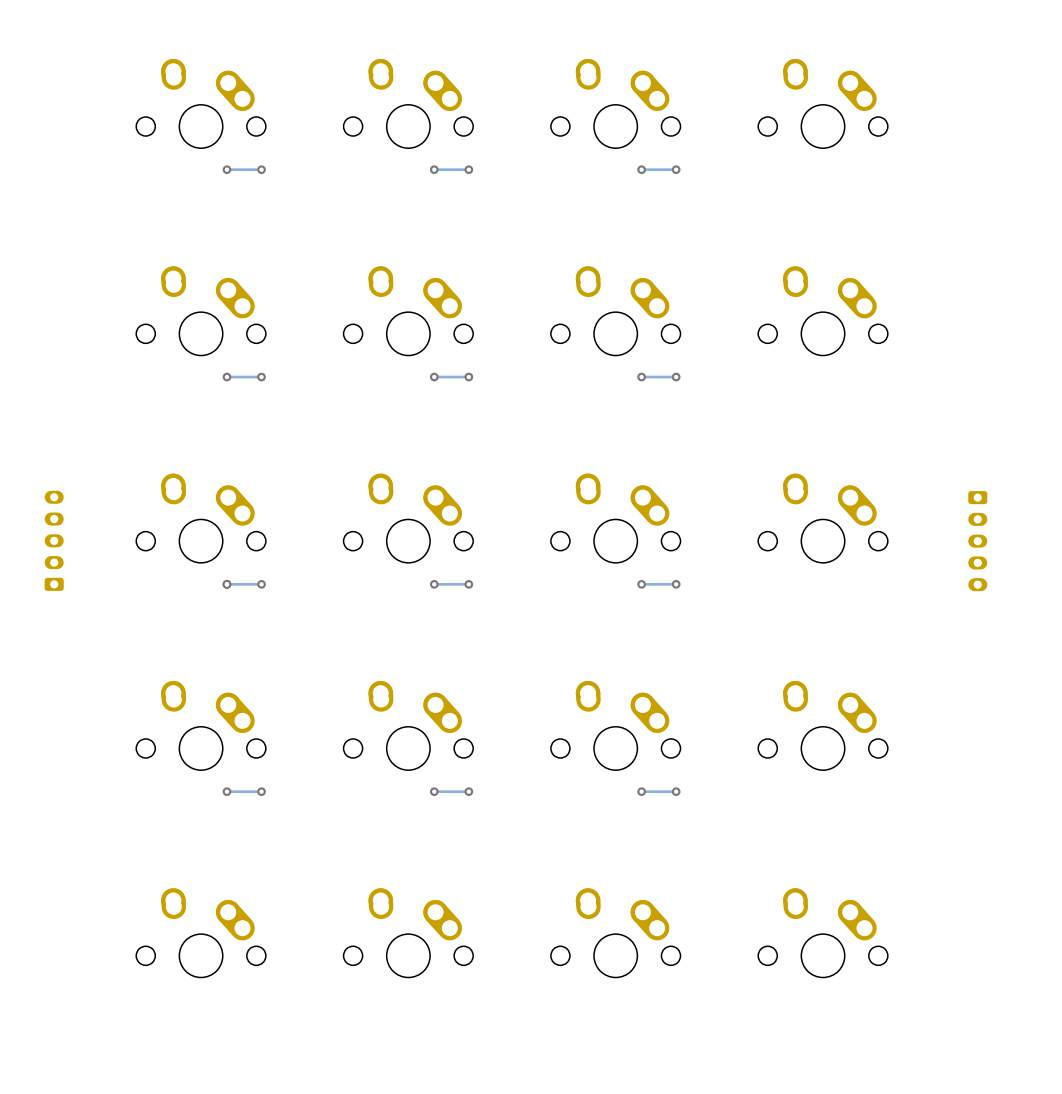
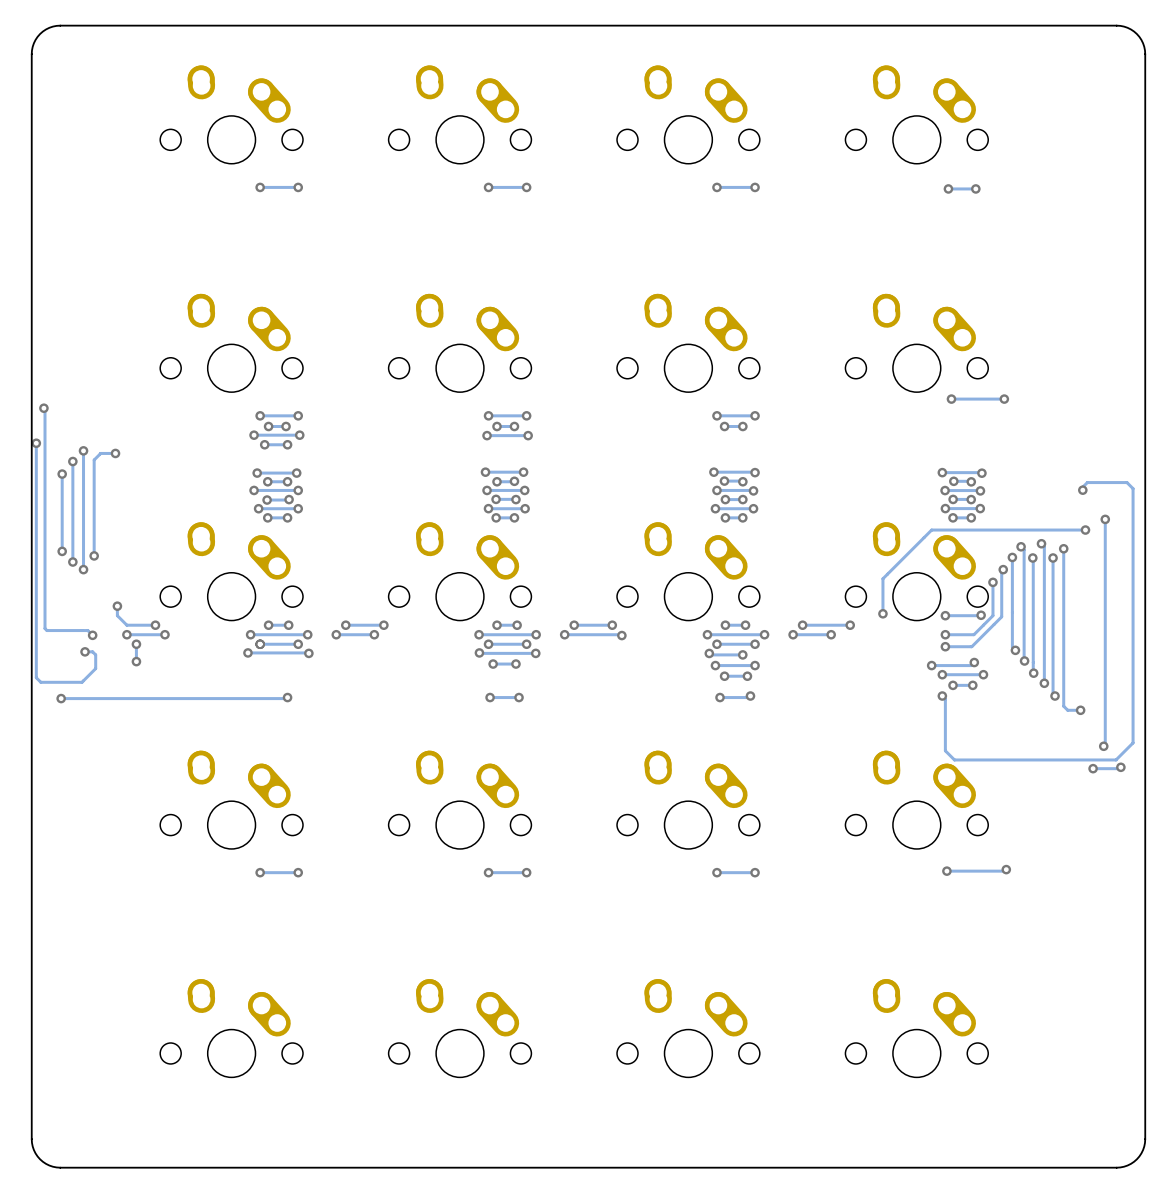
board edge: none -> (1116, 25) (60, 25) (49, 27) (40, 33) (33, 43) (31, 54) (31, 1139) (33, 1150) (40, 1159) (49, 1165) (60, 1167) (1116, 1167) (1127, 1165) (1136, 1159) (1143, 1150) (1145, 1139) (1145, 54) (1143, 43) (1136, 33) (1127, 27) (1116, 25)
via: none -> (948, 188)
track: none -> (975, 188) (948, 188)
via: none -> (975, 188)
via: none -> (951, 399)
track: none -> (1004, 399) (951, 399)
via: none -> (1004, 399)
track: none -> (43, 408) (45, 628) (46, 630) (87, 630) (92, 635)
via: none -> (43, 408)
via: none -> (268, 426)
track: none -> (286, 426) (268, 426)
via: none -> (286, 426)
via: none -> (497, 426)
track: none -> (514, 426) (497, 426)
via: none -> (514, 426)
via: none -> (724, 426)
track: none -> (742, 426) (724, 426)
via: none -> (742, 426)
via: none -> (254, 435)
track: none -> (299, 435) (254, 435)
via: none -> (299, 435)
via: none -> (487, 435)
track: none -> (528, 435) (487, 435)
via: none -> (528, 435)
track: none -> (36, 443) (36, 677) (40, 682) (81, 682) (95, 668) (95, 654) (92, 651) (85, 651)
via: none -> (36, 443)
via: none -> (264, 444)
track: none -> (287, 444) (264, 444)
via: none -> (287, 444)
track: none -> (83, 450) (83, 569)
via: none -> (83, 450)
track: none -> (115, 453) (100, 453) (94, 459) (94, 555)
via: none -> (115, 453)
track: none -> (72, 461) (72, 562)
via: none -> (72, 461)
via: none -> (257, 473)
track: none -> (296, 473) (257, 473)
via: none -> (296, 473)
via: none -> (485, 472)
track: none -> (523, 472) (485, 472)
via: none -> (523, 472)
track: none -> (713, 472) (755, 472)
via: none -> (713, 472)
via: none -> (755, 472)
track: none -> (942, 472) (981, 473)
via: none -> (942, 472)
track: none -> (62, 474) (62, 551)
via: none -> (62, 474)
via: none -> (981, 473)
via: none -> (267, 481)
track: none -> (287, 481) (267, 481)
via: none -> (287, 481)
via: none -> (497, 481)
track: none -> (514, 481) (497, 481)
via: none -> (514, 481)
track: none -> (724, 481) (742, 481)
via: none -> (724, 481)
via: none -> (742, 481)
track: none -> (953, 481) (971, 481)
via: none -> (953, 481)
via: none -> (971, 481)
via: none -> (254, 490)
track: none -> (298, 490) (254, 490)
via: none -> (298, 490)
via: none -> (487, 490)
track: none -> (524, 490) (487, 490)
via: none -> (524, 490)
track: none -> (716, 490) (753, 490)
via: none -> (716, 490)
track: none -> (945, 490) (980, 490)
via: none -> (945, 490)
track: none -> (1082, 490) (1082, 487) (1087, 482) (1126, 482) (1133, 488) (1133, 742) (1116, 759) (954, 759) (945, 750) (945, 699) (942, 696)
via: none -> (1082, 490)
via: none -> (753, 490)
via: none -> (980, 490)
track: none -> (496, 499) (515, 499)
via: none -> (496, 499)
via: none -> (953, 499)
track: none -> (971, 499) (953, 499)
via: none -> (267, 500)
track: none -> (289, 499) (267, 500)
via: none -> (289, 499)
via: none -> (515, 499)
via: none -> (725, 499)
track: none -> (742, 499) (725, 499)
via: none -> (742, 499)
via: none -> (971, 499)
via: none -> (258, 508)
track: none -> (298, 508) (258, 508)
via: none -> (298, 508)
via: none -> (488, 508)
track: none -> (525, 508) (488, 508)
via: none -> (525, 508)
via: none -> (715, 508)
track: none -> (753, 508) (715, 508)
via: none -> (753, 508)
via: none -> (945, 508)
track: none -> (980, 508) (945, 508)
via: none -> (980, 508)
via: none -> (267, 517)
track: none -> (287, 517) (267, 517)
via: none -> (287, 517)
via: none -> (496, 517)
track: none -> (514, 517) (496, 517)
via: none -> (514, 517)
via: none -> (725, 517)
track: none -> (742, 517) (725, 517)
via: none -> (742, 517)
via: none -> (953, 517)
track: none -> (971, 517) (953, 517)
via: none -> (971, 517)
track: none -> (1105, 519) (1105, 744) (1103, 746)
via: none -> (1105, 519)
track: none -> (1085, 530) (931, 530) (882, 578) (882, 613)
via: none -> (1085, 530)
track: none -> (1041, 543) (1044, 546) (1044, 683)
via: none -> (1041, 543)
track: none -> (1021, 546) (1024, 549) (1024, 660)
via: none -> (1021, 546)
track: none -> (1063, 548) (1063, 706) (1067, 710) (1080, 710)
via: none -> (1063, 548)
via: none -> (62, 551)
via: none -> (94, 555)
track: none -> (1012, 557) (1012, 647) (1015, 650)
via: none -> (1012, 557)
track: none -> (1032, 558) (1033, 673)
via: none -> (1032, 558)
track: none -> (1053, 558) (1053, 694) (1055, 696)
via: none -> (1053, 558)
via: none -> (72, 562)
via: none -> (83, 569)
track: none -> (1003, 569) (1001, 616) (971, 646) (945, 646)
via: none -> (1003, 569)
track: none -> (992, 582) (992, 615) (973, 634) (945, 634)
via: none -> (992, 582)
part: (54, 540) -> none
part: (977, 541) -> none
track: none -> (117, 606) (117, 615) (126, 625) (155, 625)
via: none -> (117, 606)
via: none -> (882, 613)
via: none -> (945, 615)
track: none -> (981, 615) (945, 615)
via: none -> (981, 615)
via: none -> (155, 625)
via: none -> (268, 625)
track: none -> (288, 625) (268, 625)
via: none -> (288, 625)
via: none -> (345, 625)
track: none -> (383, 625) (345, 625)
via: none -> (383, 625)
via: none -> (497, 625)
track: none -> (517, 625) (497, 625)
via: none -> (517, 625)
via: none -> (574, 625)
track: none -> (612, 625) (574, 625)
via: none -> (612, 625)
via: none -> (725, 625)
track: none -> (745, 625) (725, 625)
via: none -> (745, 625)
via: none -> (802, 625)
track: none -> (850, 625) (802, 625)
via: none -> (850, 625)
via: none -> (126, 634)
track: none -> (164, 634) (126, 634)
via: none -> (164, 634)
via: none -> (250, 634)
track: none -> (307, 634) (250, 634)
via: none -> (307, 634)
via: none -> (336, 634)
track: none -> (374, 634) (336, 634)
via: none -> (374, 634)
via: none -> (479, 634)
track: none -> (536, 634) (479, 634)
via: none -> (536, 634)
track: none -> (564, 634) (621, 635)
via: none -> (564, 634)
via: none -> (707, 634)
track: none -> (764, 634) (707, 634)
via: none -> (764, 634)
via: none -> (793, 634)
track: none -> (831, 634) (793, 634)
via: none -> (831, 634)
via: none -> (945, 634)
via: none -> (92, 635)
via: none -> (621, 635)
track: none -> (136, 644) (136, 661)
via: none -> (136, 644)
via: none -> (945, 646)
via: none -> (1015, 650)
via: none -> (85, 651)
track: none -> (247, 652) (308, 653)
via: none -> (247, 652)
via: none -> (308, 653)
track: none -> (479, 652) (535, 653)
via: none -> (479, 652)
via: none -> (535, 653)
track: none -> (709, 653) (742, 654)
via: none -> (709, 653)
via: none -> (742, 654)
via: none -> (1024, 660)
via: none -> (136, 661)
track: none -> (974, 662) (971, 665) (931, 665)
via: none -> (974, 662)
via: none -> (493, 664)
track: none -> (515, 664) (493, 664)
via: none -> (515, 664)
via: none -> (715, 665)
track: none -> (755, 665) (715, 665)
via: none -> (755, 665)
via: none -> (931, 665)
via: none -> (1033, 673)
via: none -> (942, 674)
track: none -> (983, 674) (942, 674)
via: none -> (983, 674)
via: none -> (724, 676)
track: none -> (747, 676) (724, 676)
via: none -> (747, 676)
via: none -> (1044, 683)
via: none -> (953, 685)
track: none -> (972, 685) (953, 685)
via: none -> (972, 685)
track: none -> (750, 696) (720, 697)
via: none -> (750, 696)
via: none -> (942, 696)
via: none -> (1055, 696)
track: none -> (287, 697) (61, 698)
via: none -> (287, 697)
via: none -> (490, 697)
track: none -> (519, 697) (490, 697)
via: none -> (519, 697)
via: none -> (720, 697)
via: none -> (61, 698)
via: none -> (1080, 710)
via: none -> (1103, 746)
track: none -> (1120, 767) (1093, 768)
via: none -> (1120, 767)
via: none -> (1093, 768)
track: none -> (1006, 869) (946, 871)
via: none -> (1006, 869)
via: none -> (946, 871)

